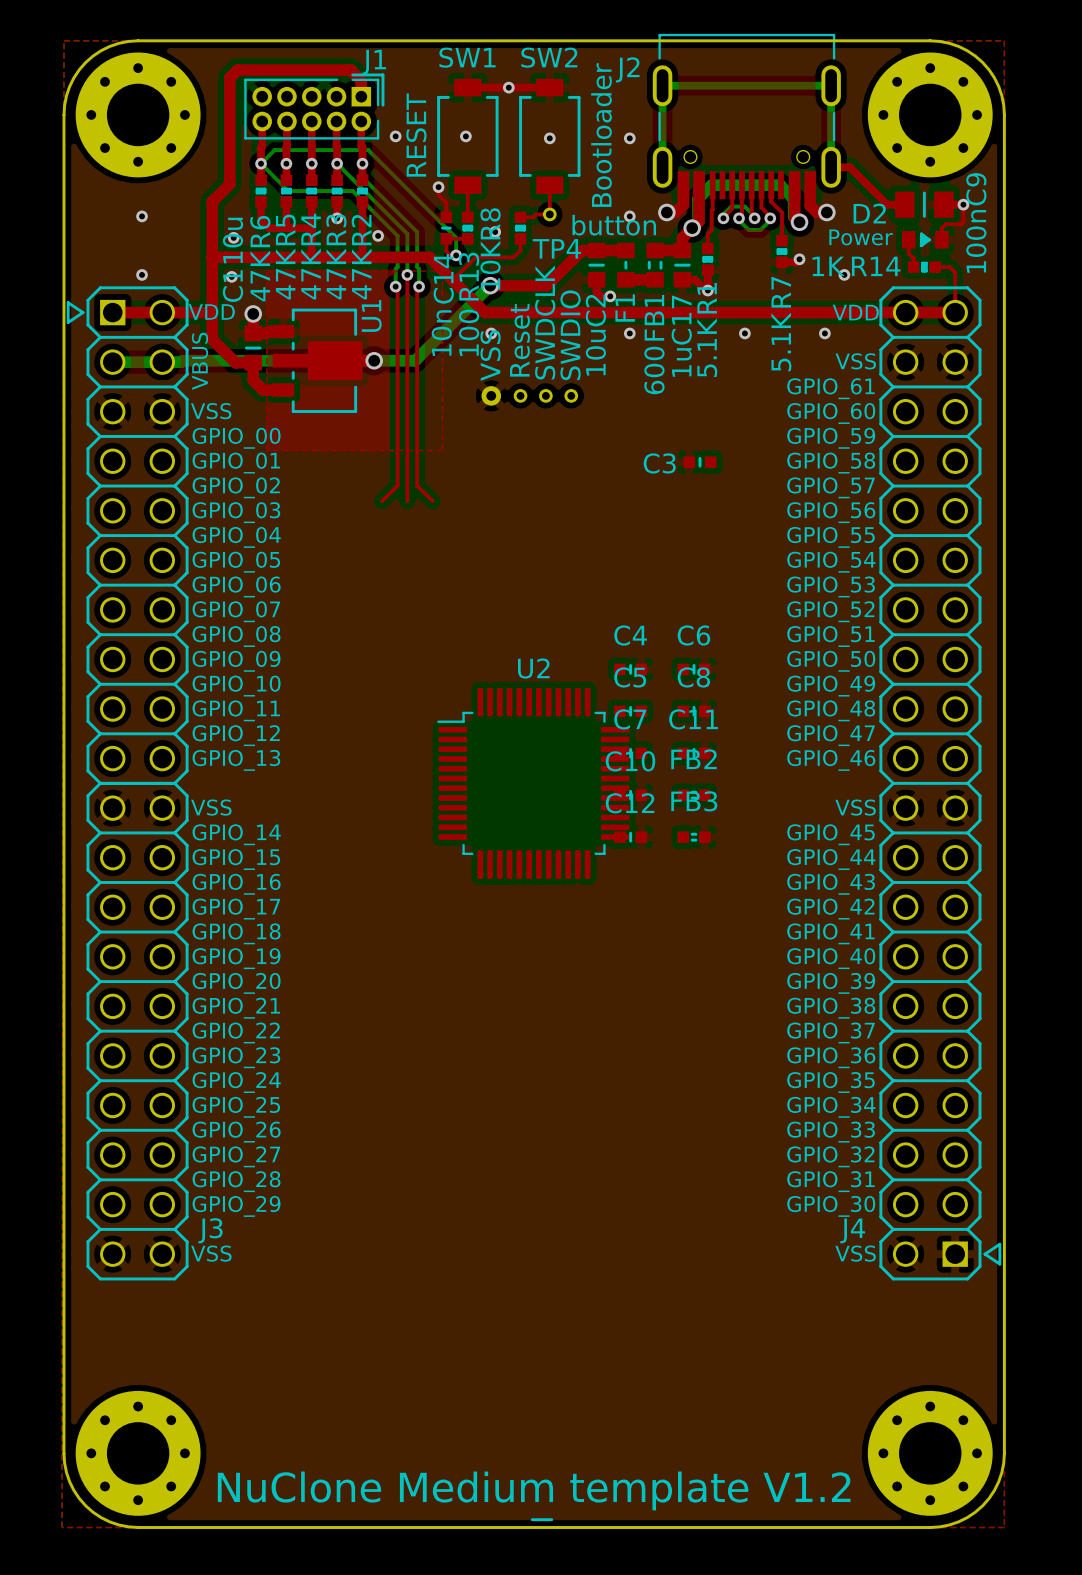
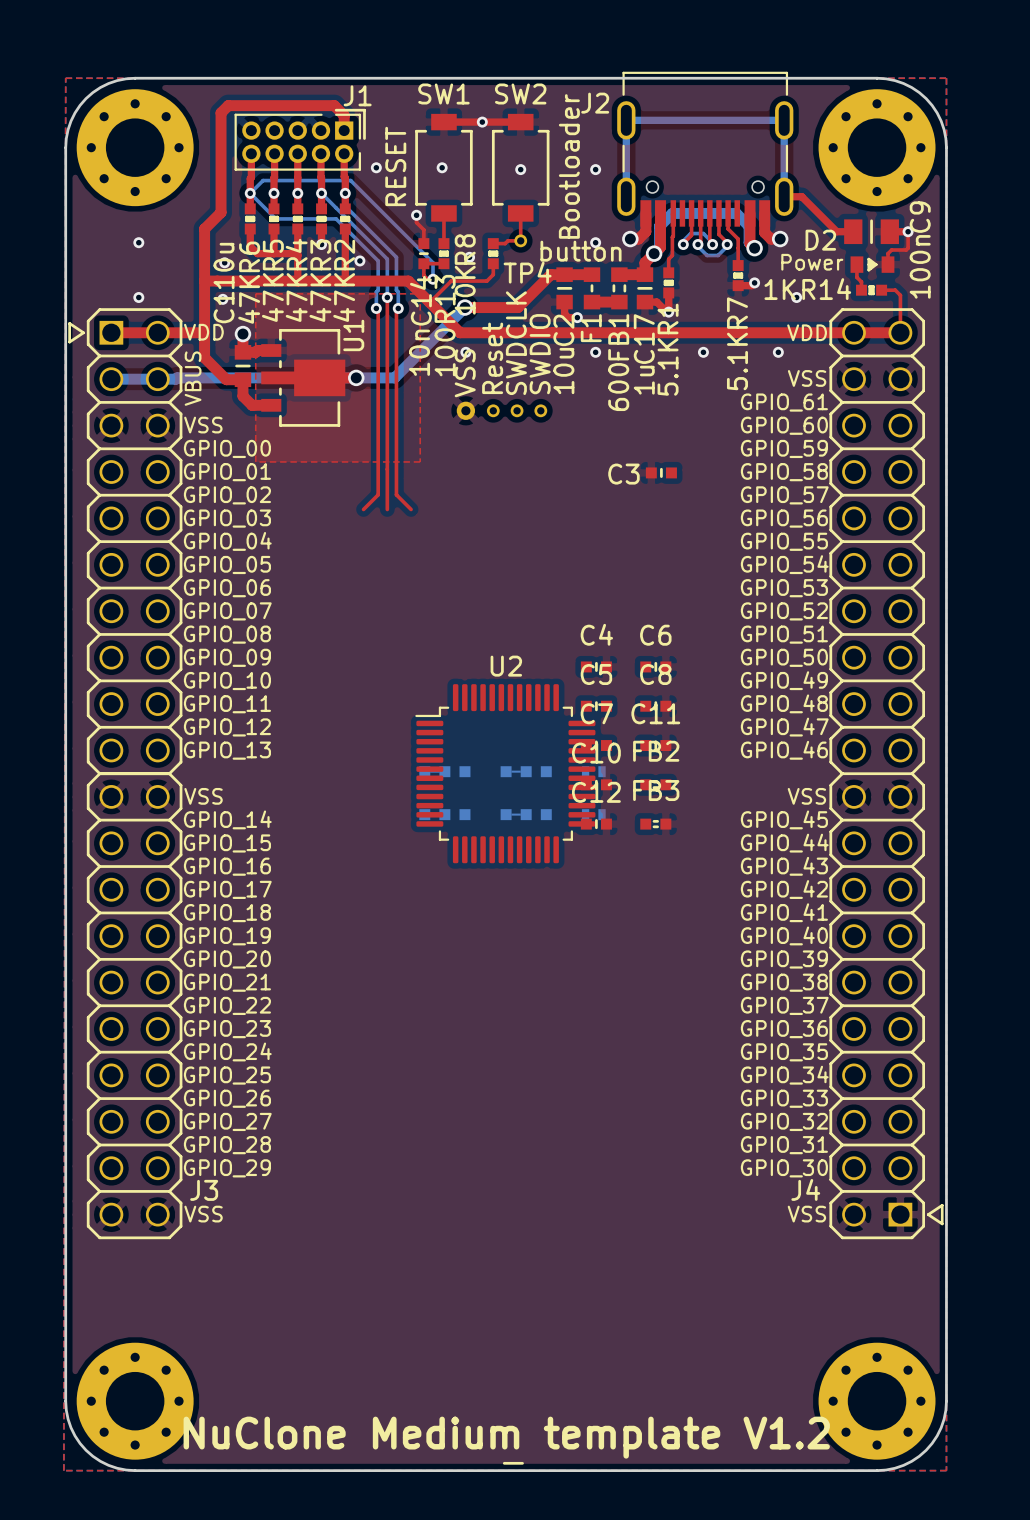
part: none -> (444, 771)
part: none -> (526, 771)
part: none -> (593, 771)
part: none -> (444, 814)
part: none -> (526, 814)
part: none -> (593, 814)

